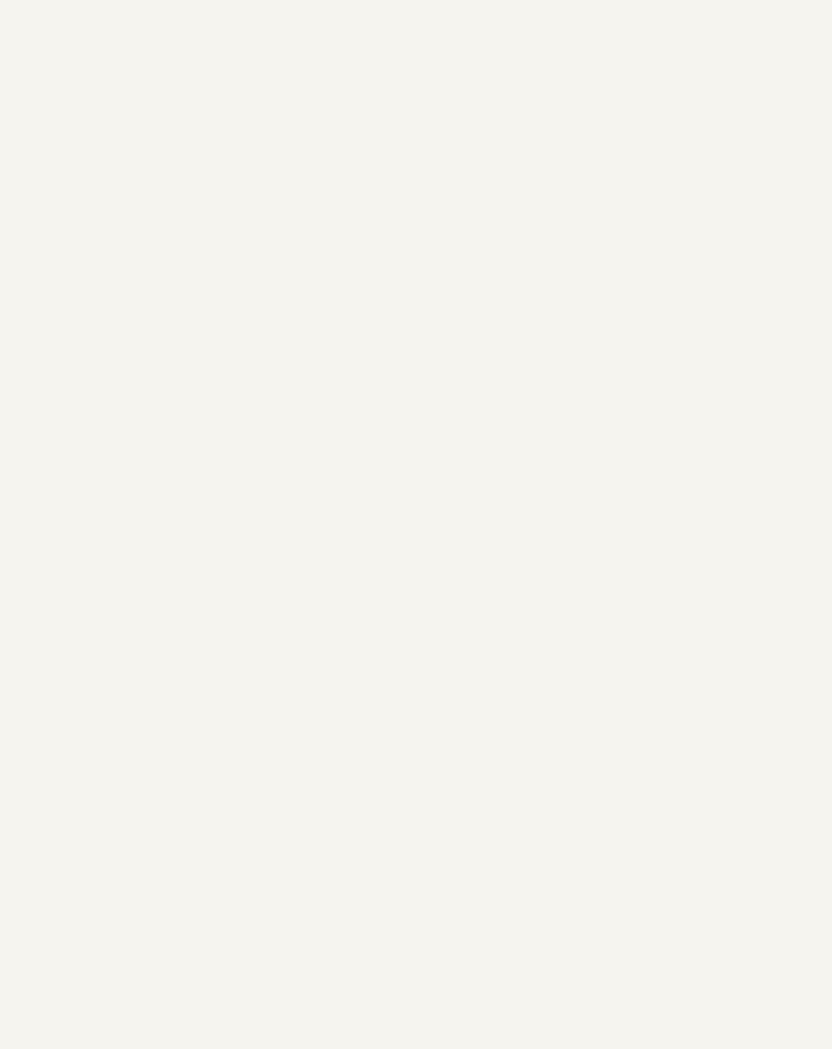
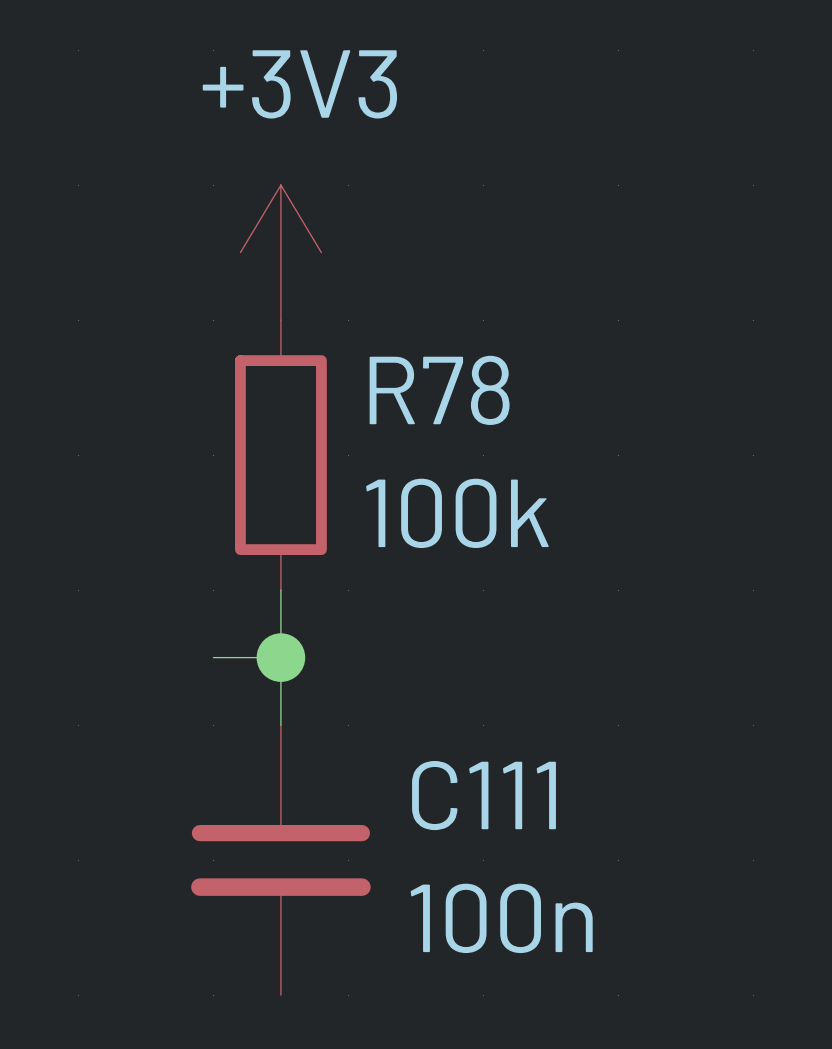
power symbol: none -> +3V3 (280, 252)
R78: none -> 100k (280, 455)
wire: none -> (280, 590) (280, 725)
wire: none -> (213, 657) (280, 657)
junction: none -> (280, 657)
C111: none -> 100n (280, 860)

